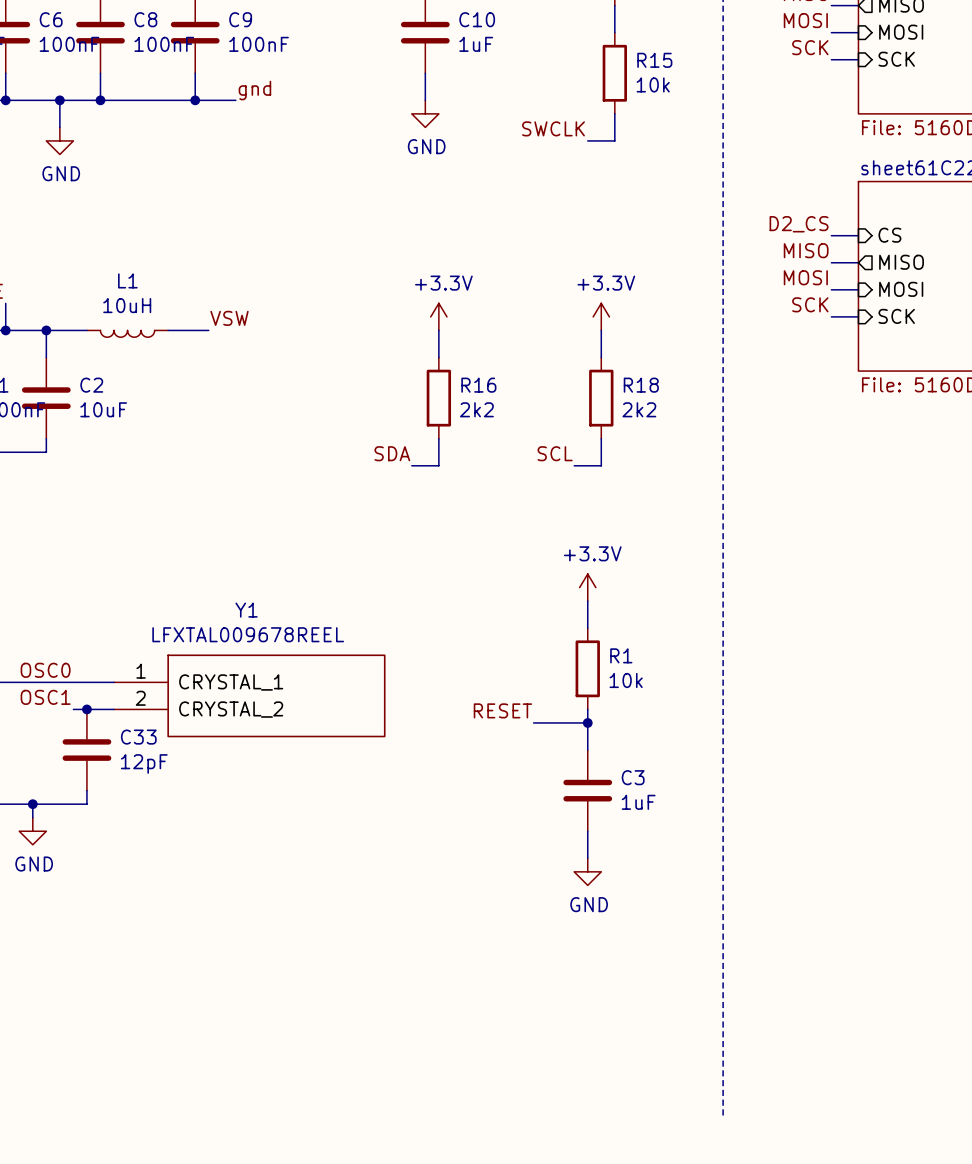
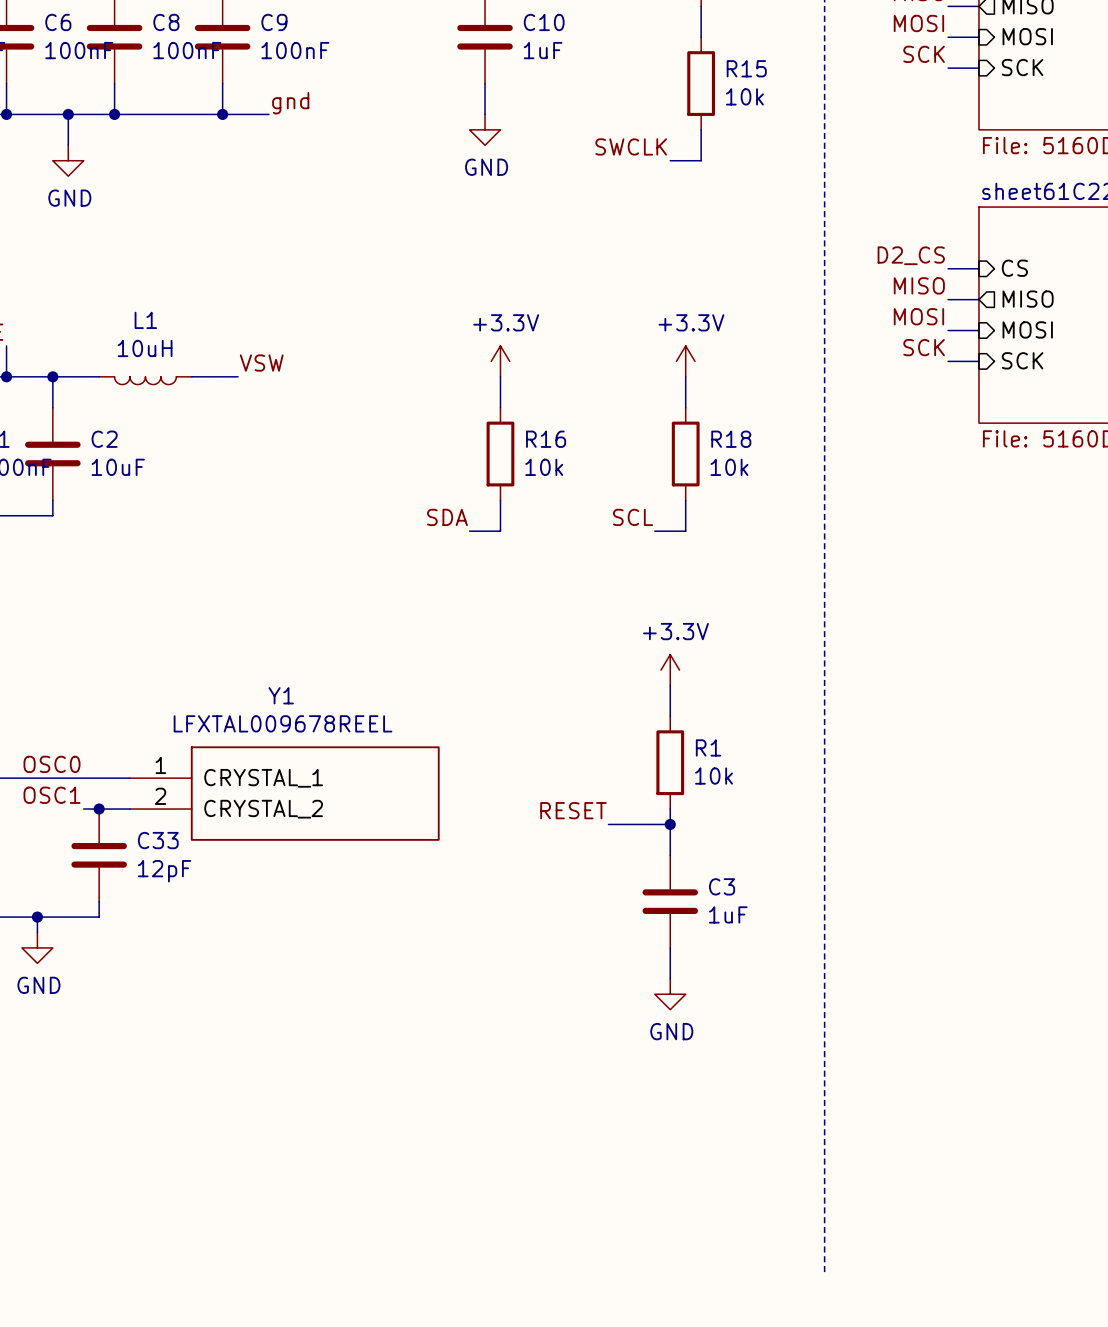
R16 value: 2k2 (476, 409) -> 10k (544, 467)
R18 value: 2k2 (639, 409) -> 10k (729, 467)

